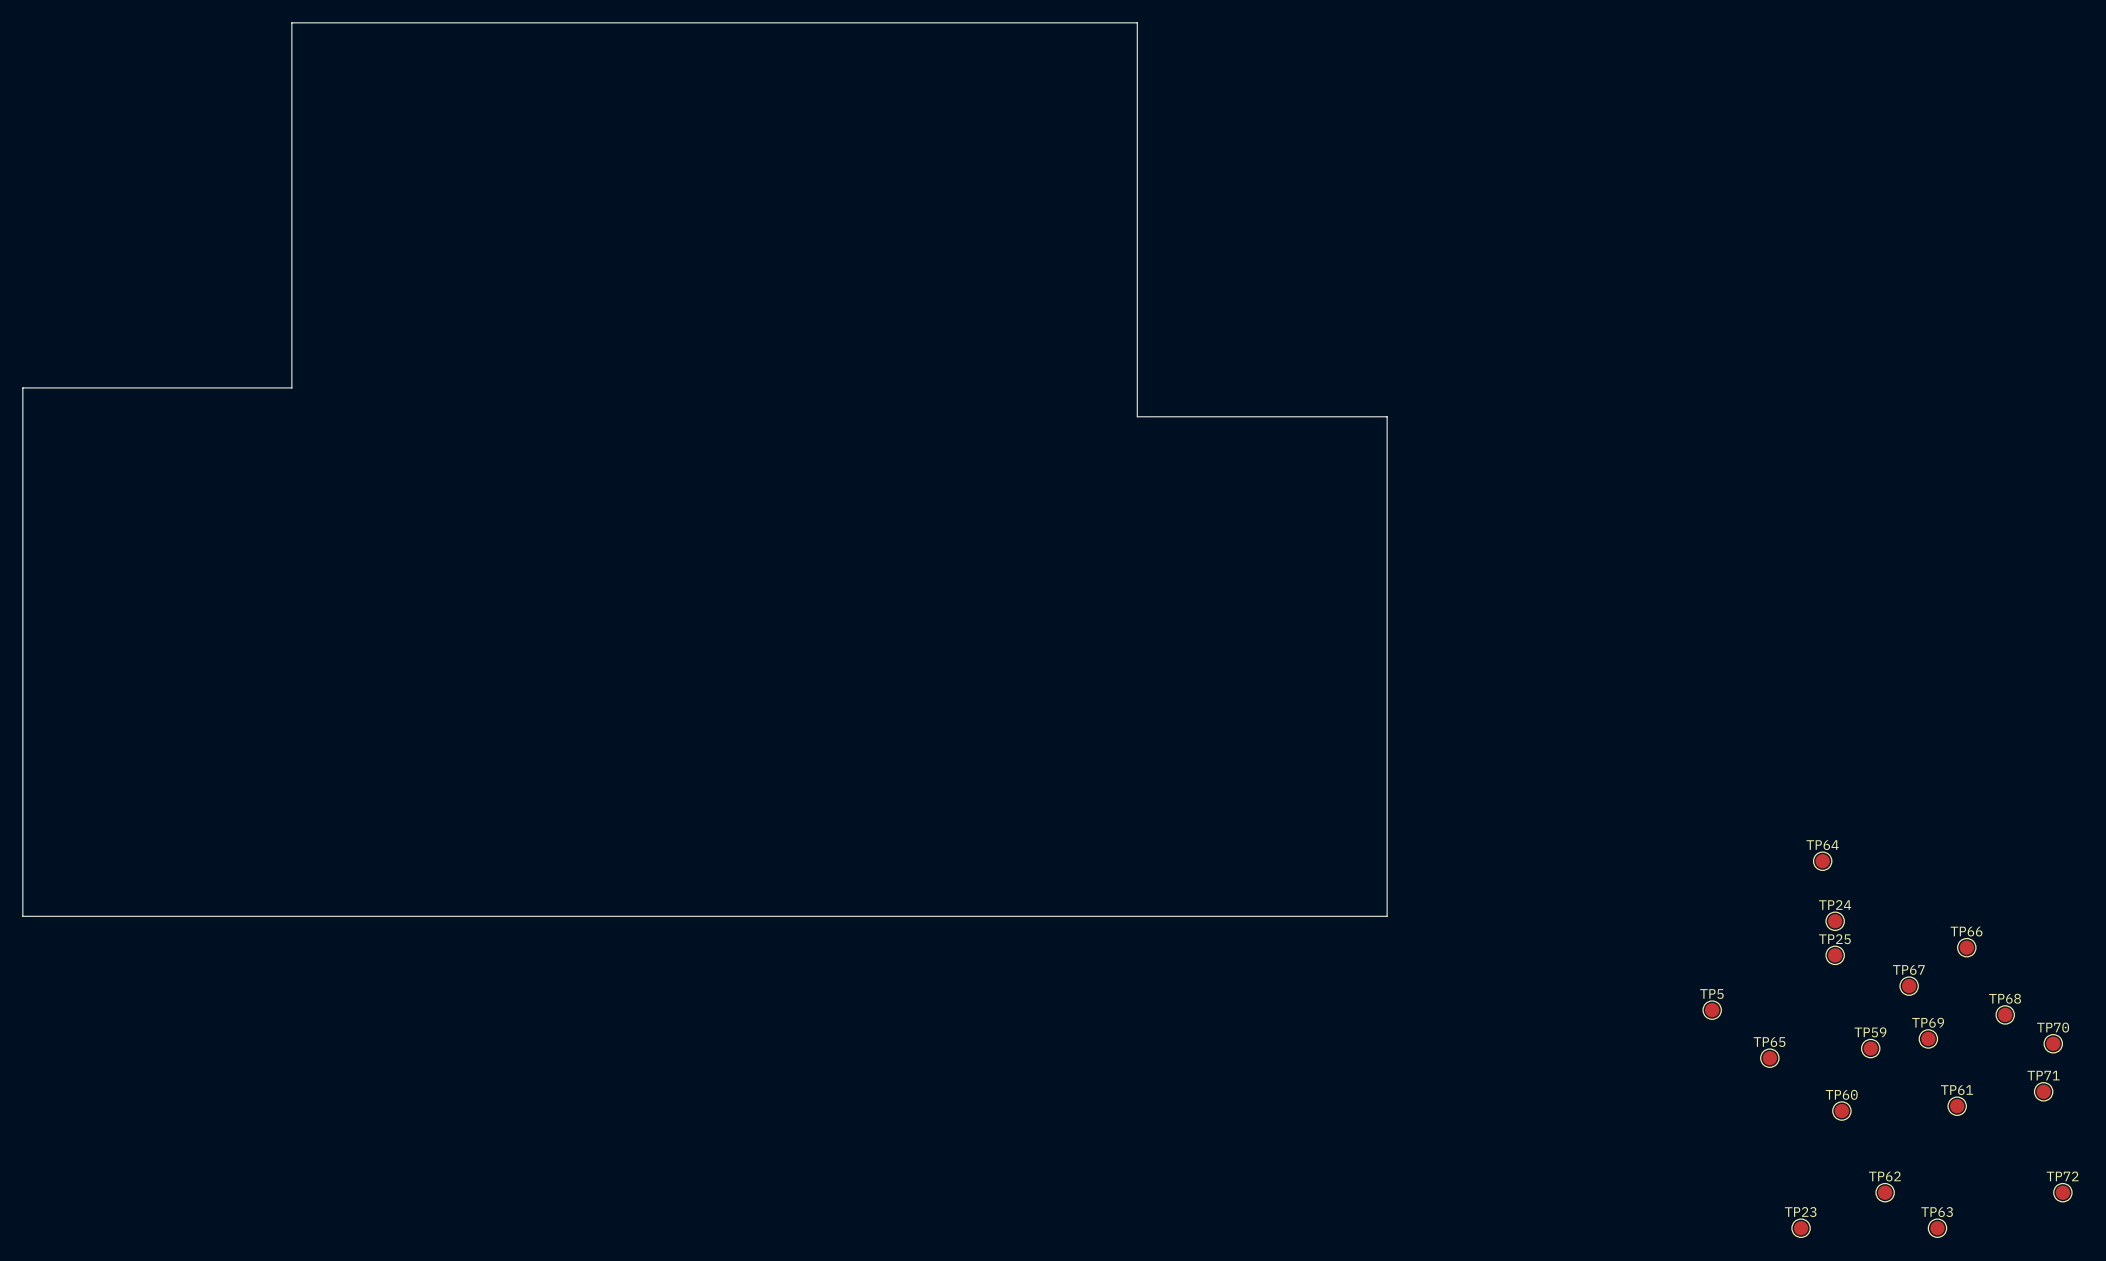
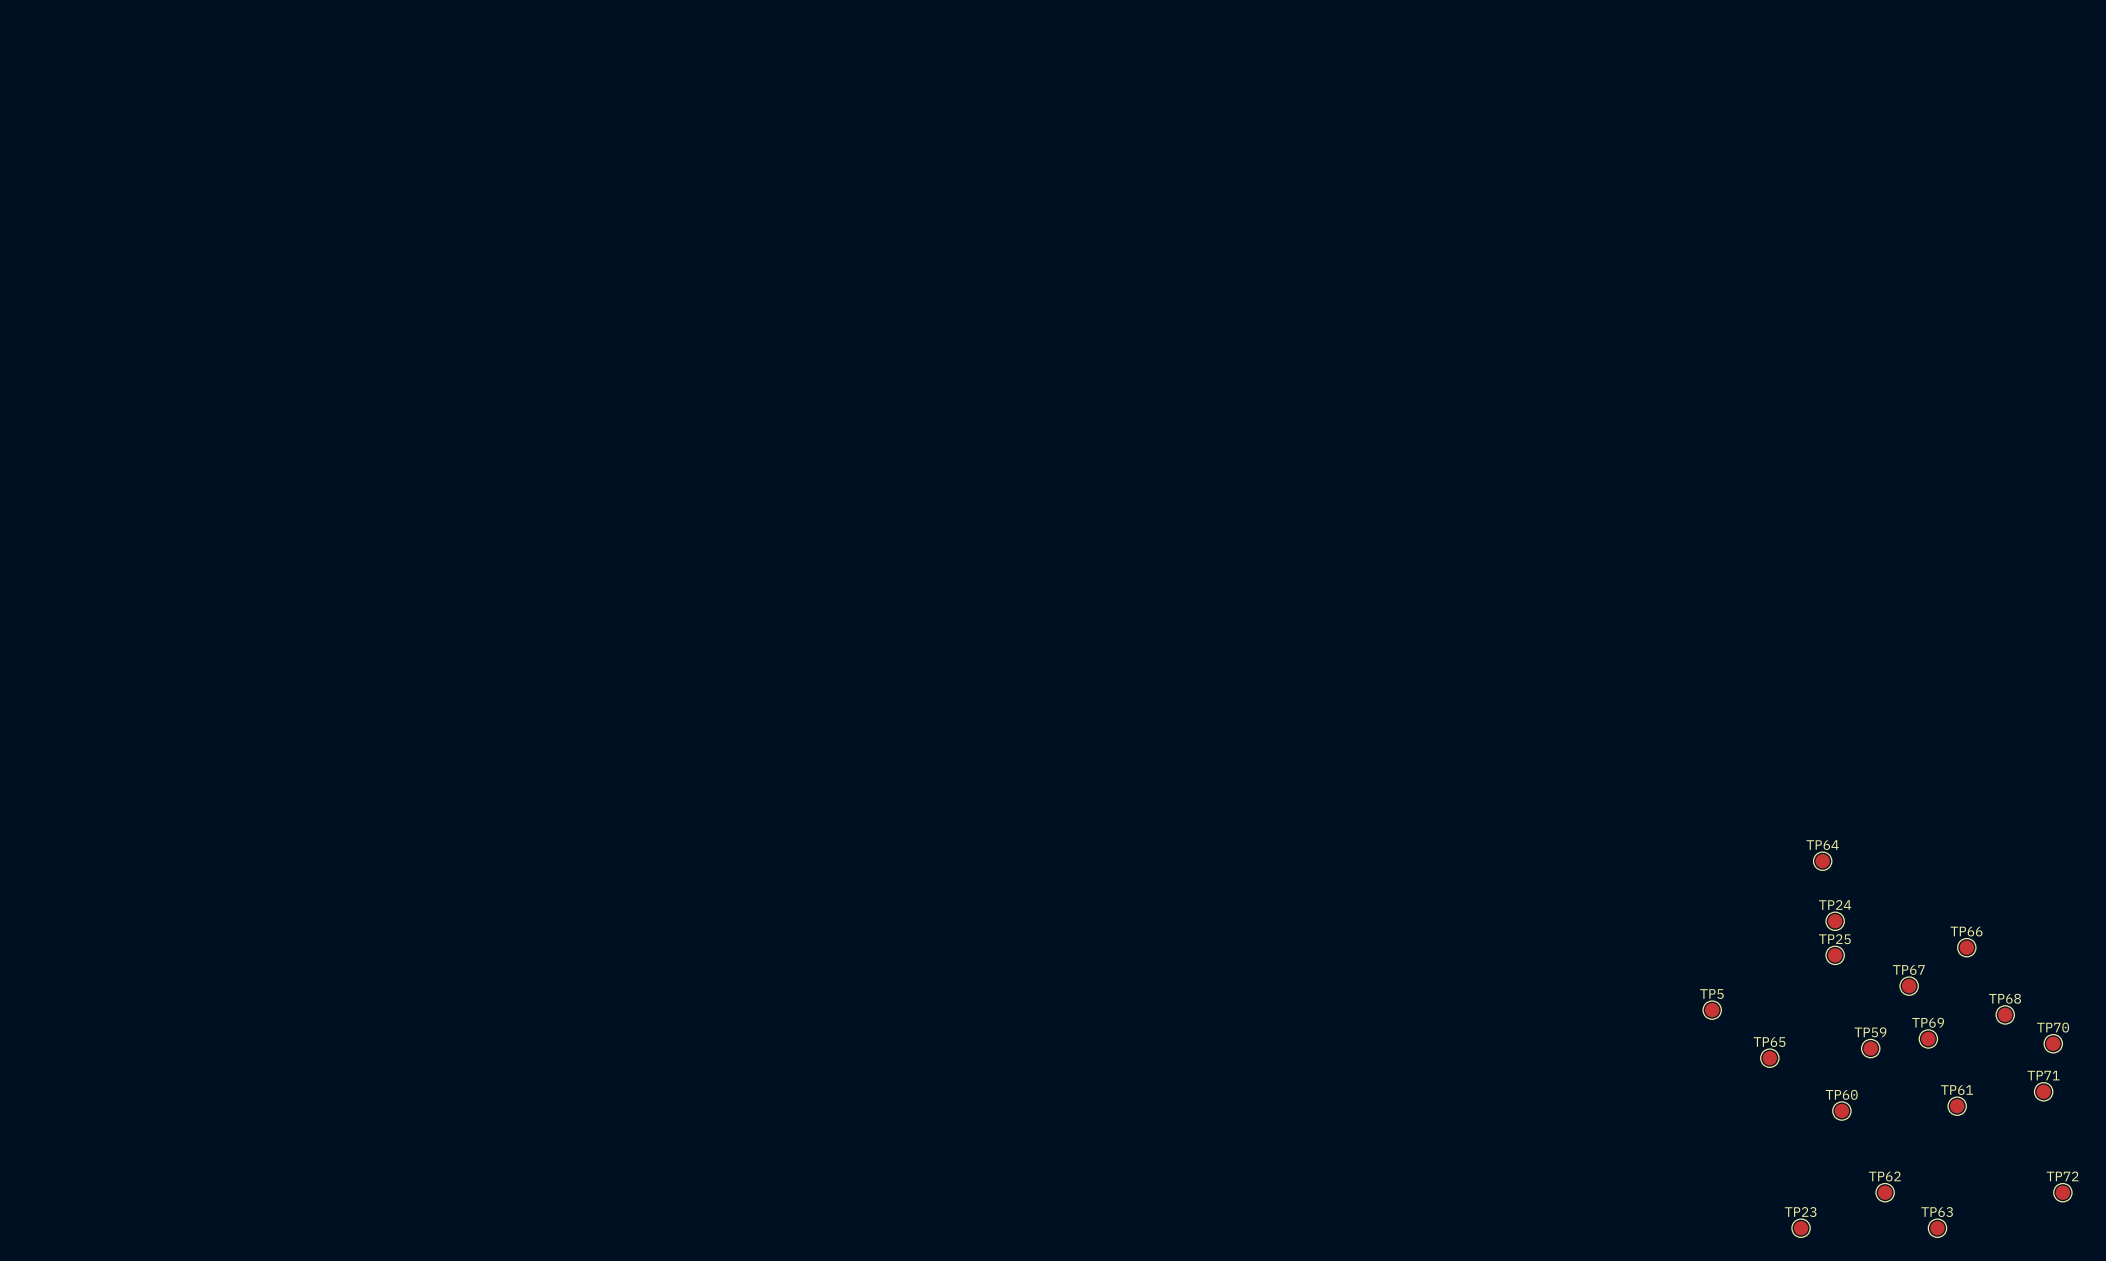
board edge: (291, 22) (291, 387) (22, 387) (22, 916) (1387, 916) (1387, 416) (1137, 416) (1137, 22) (291, 22) -> none

